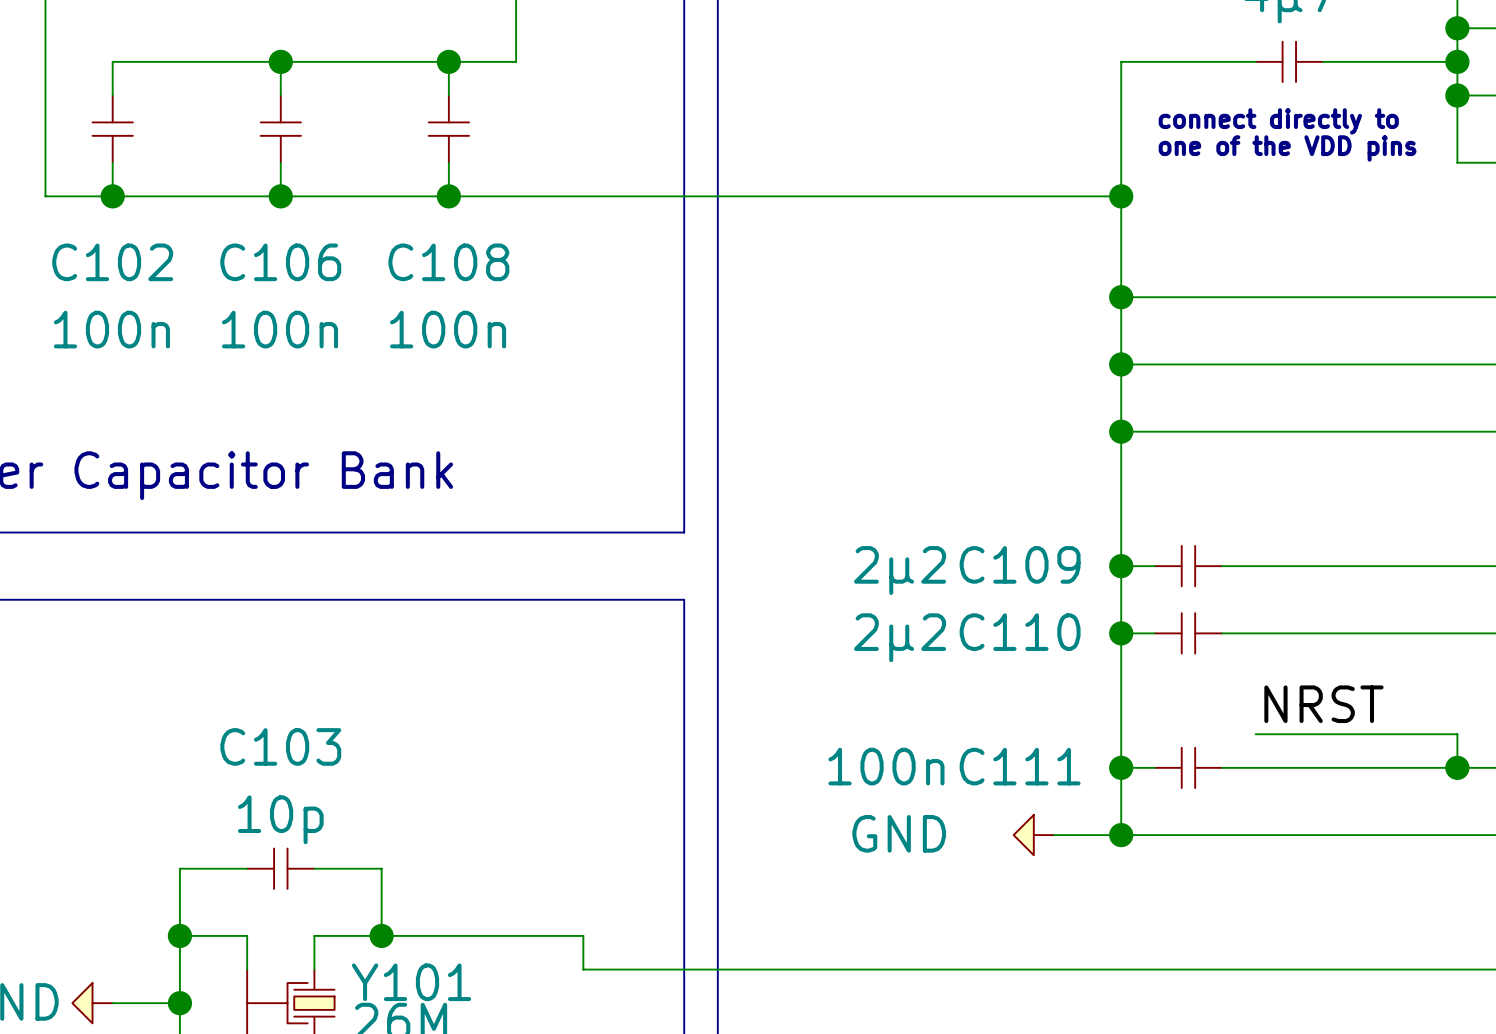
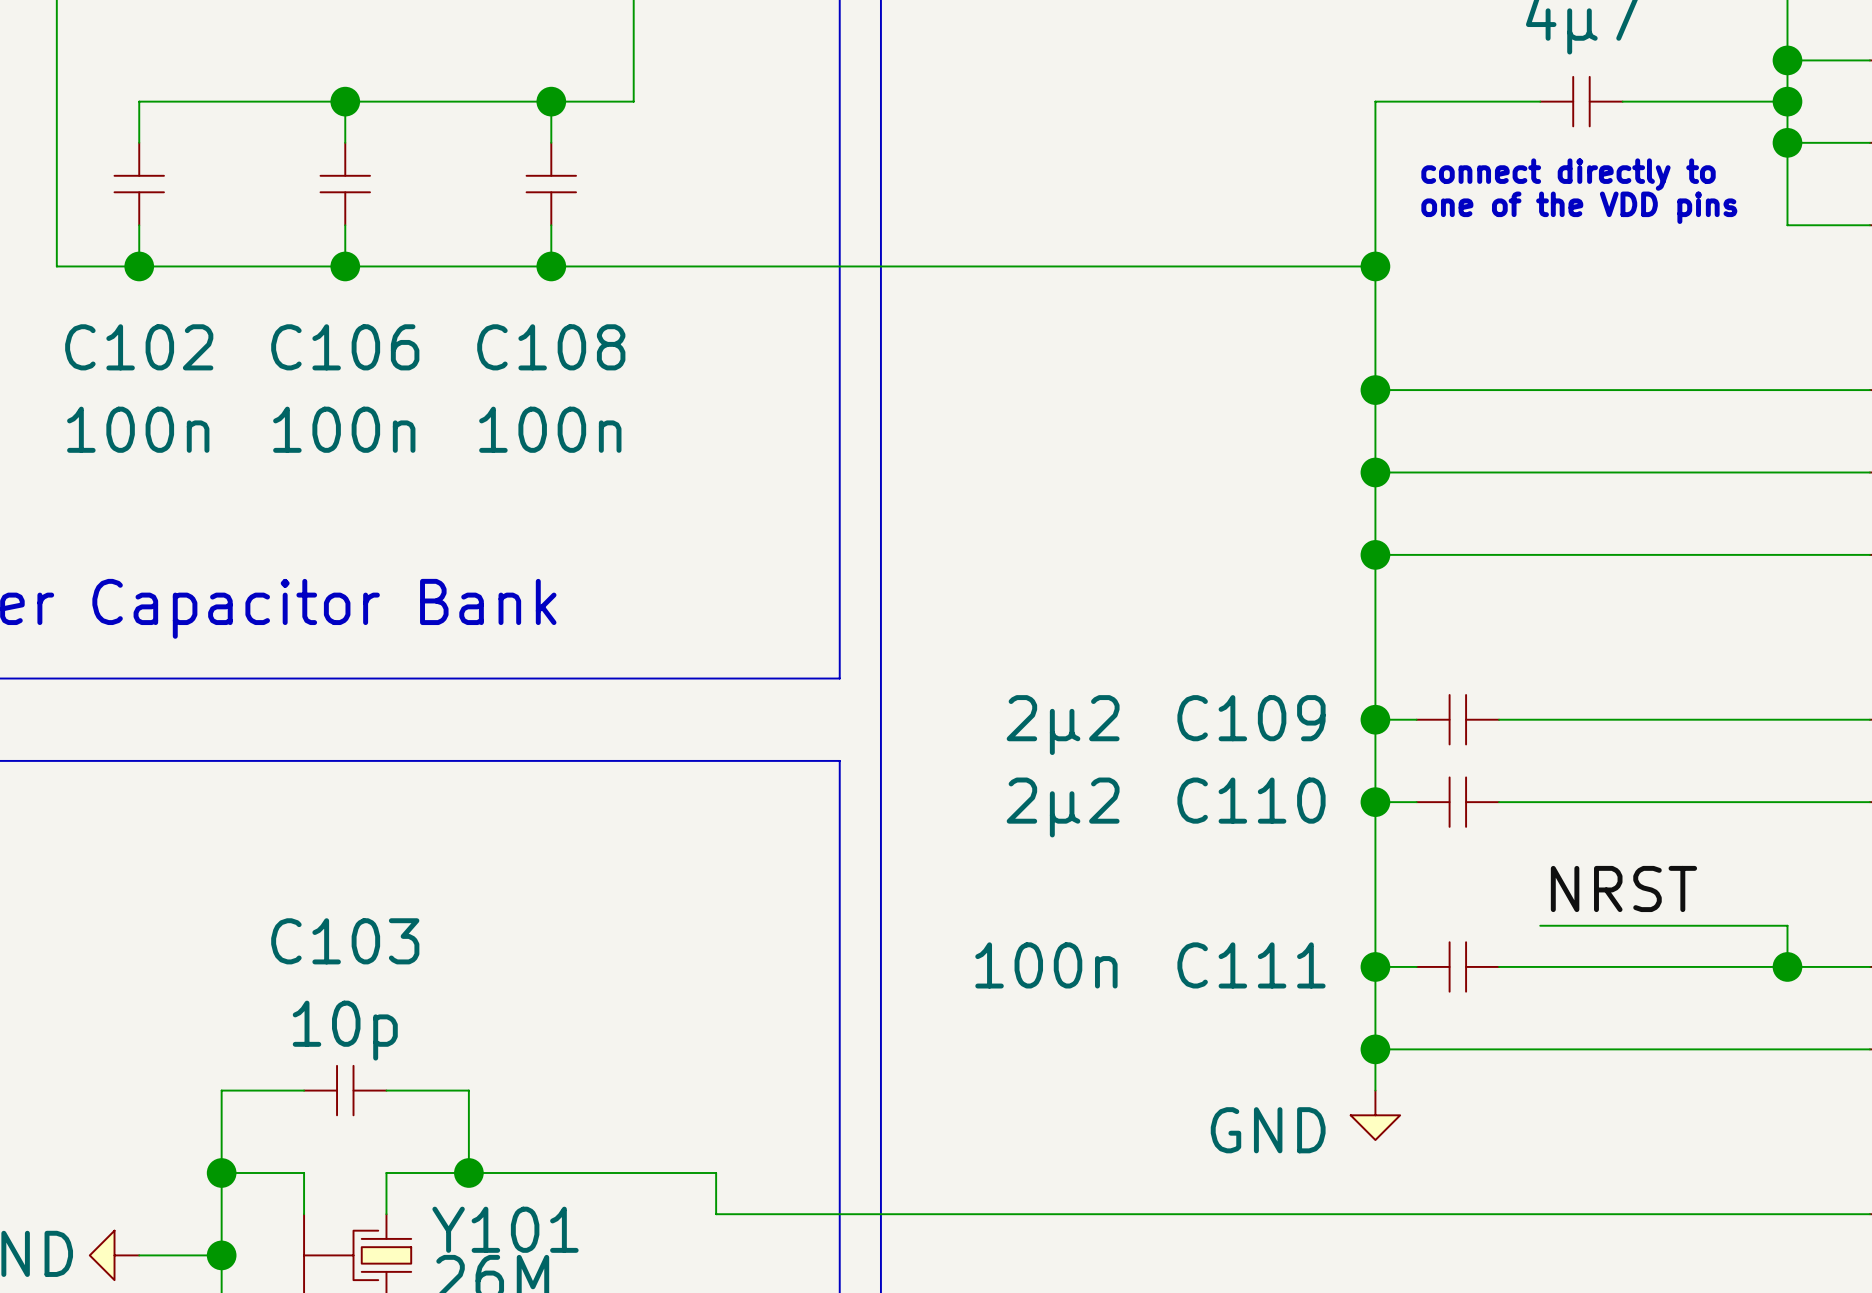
C109 value position: 2µ2 (900, 570) -> 2µ2 (1063, 725)
C110 value position: 2µ2 (900, 637) -> 2µ2 (1063, 807)
C111 value position: 100n (886, 766) -> 100n (1046, 965)
power symbol rotation: 0° (1033, 835) -> 90° counterclockwise (1375, 1115)
power symbol position: GND (1033, 835) -> GND (1375, 1115)
wire: (1053, 835) (1121, 835) -> (1375, 1090) (1375, 1049)

